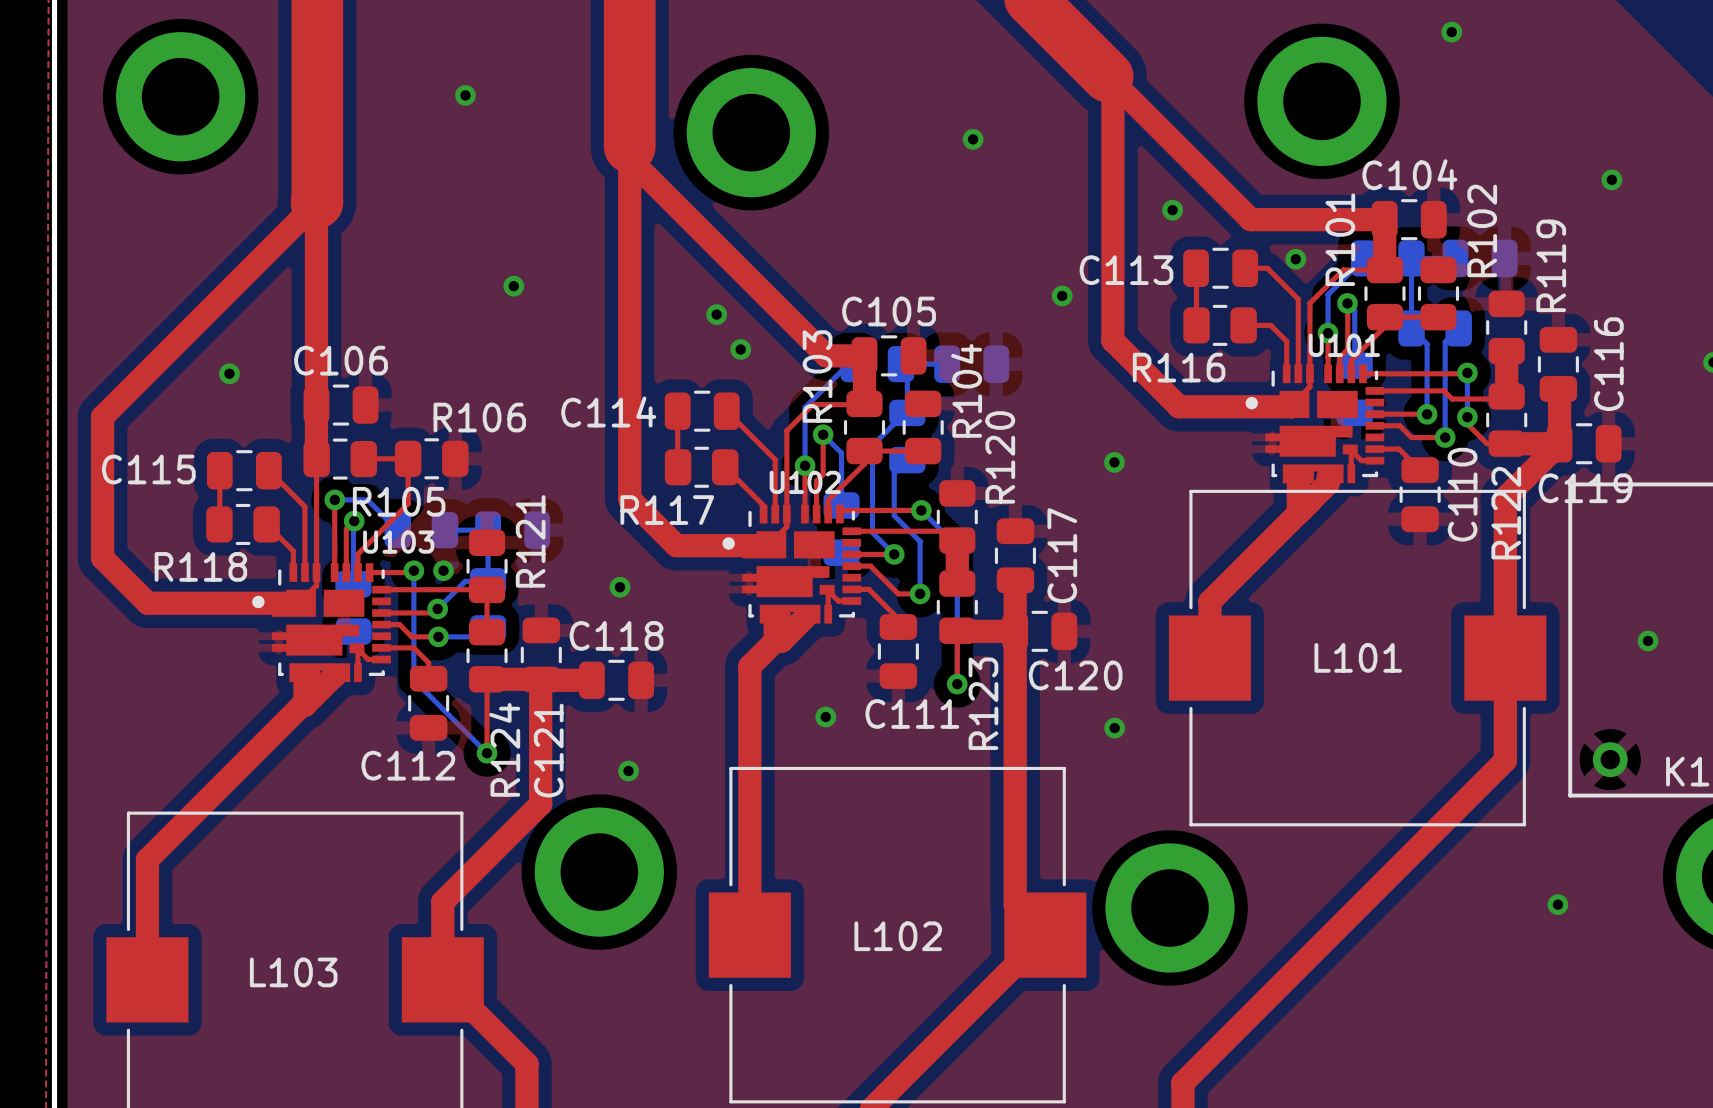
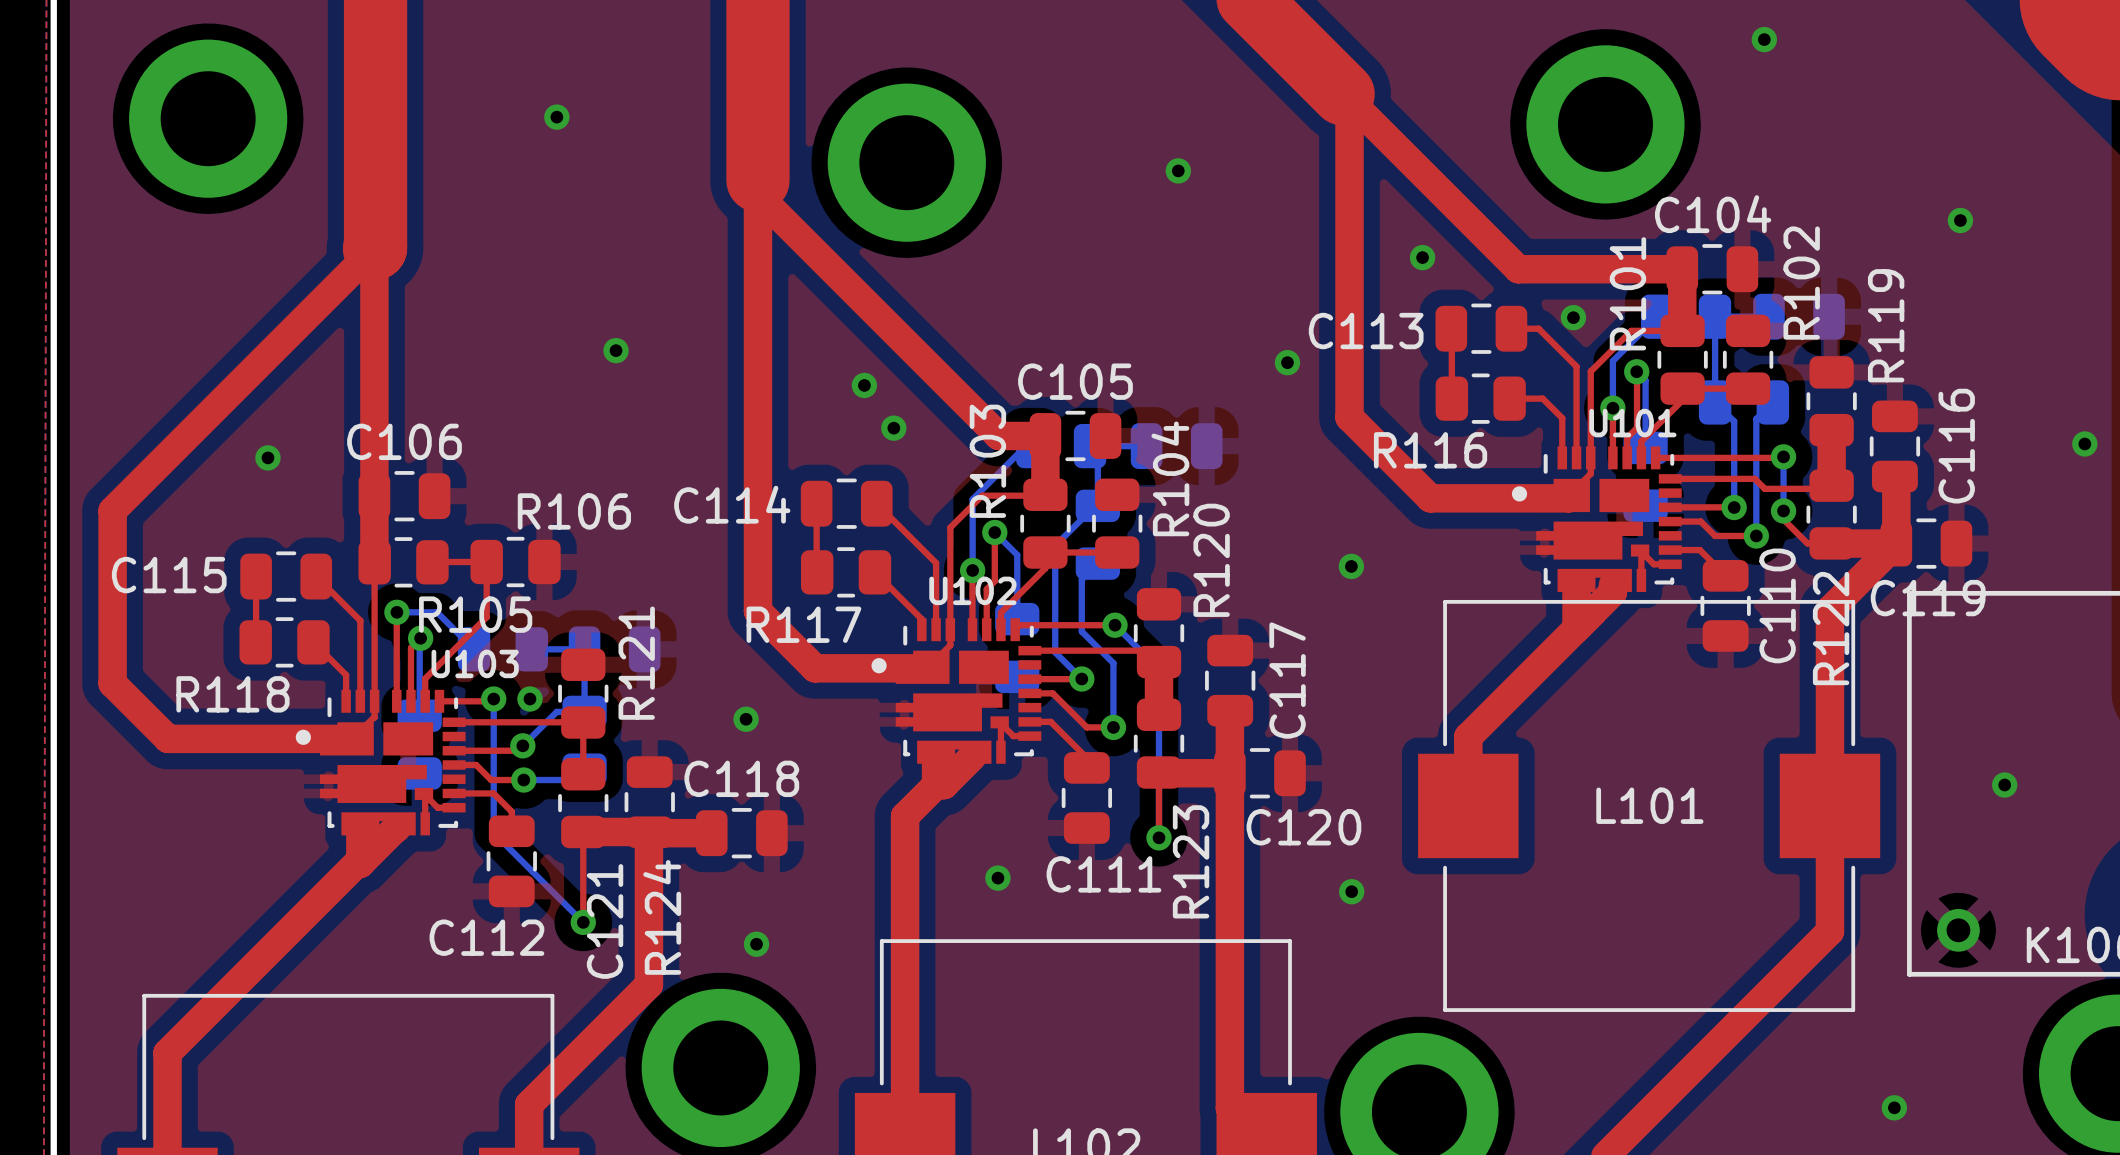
R124 name position: R124 (504, 749) -> R124 (662, 917)
C121 name position: C121 (548, 750) -> C121 (605, 921)

